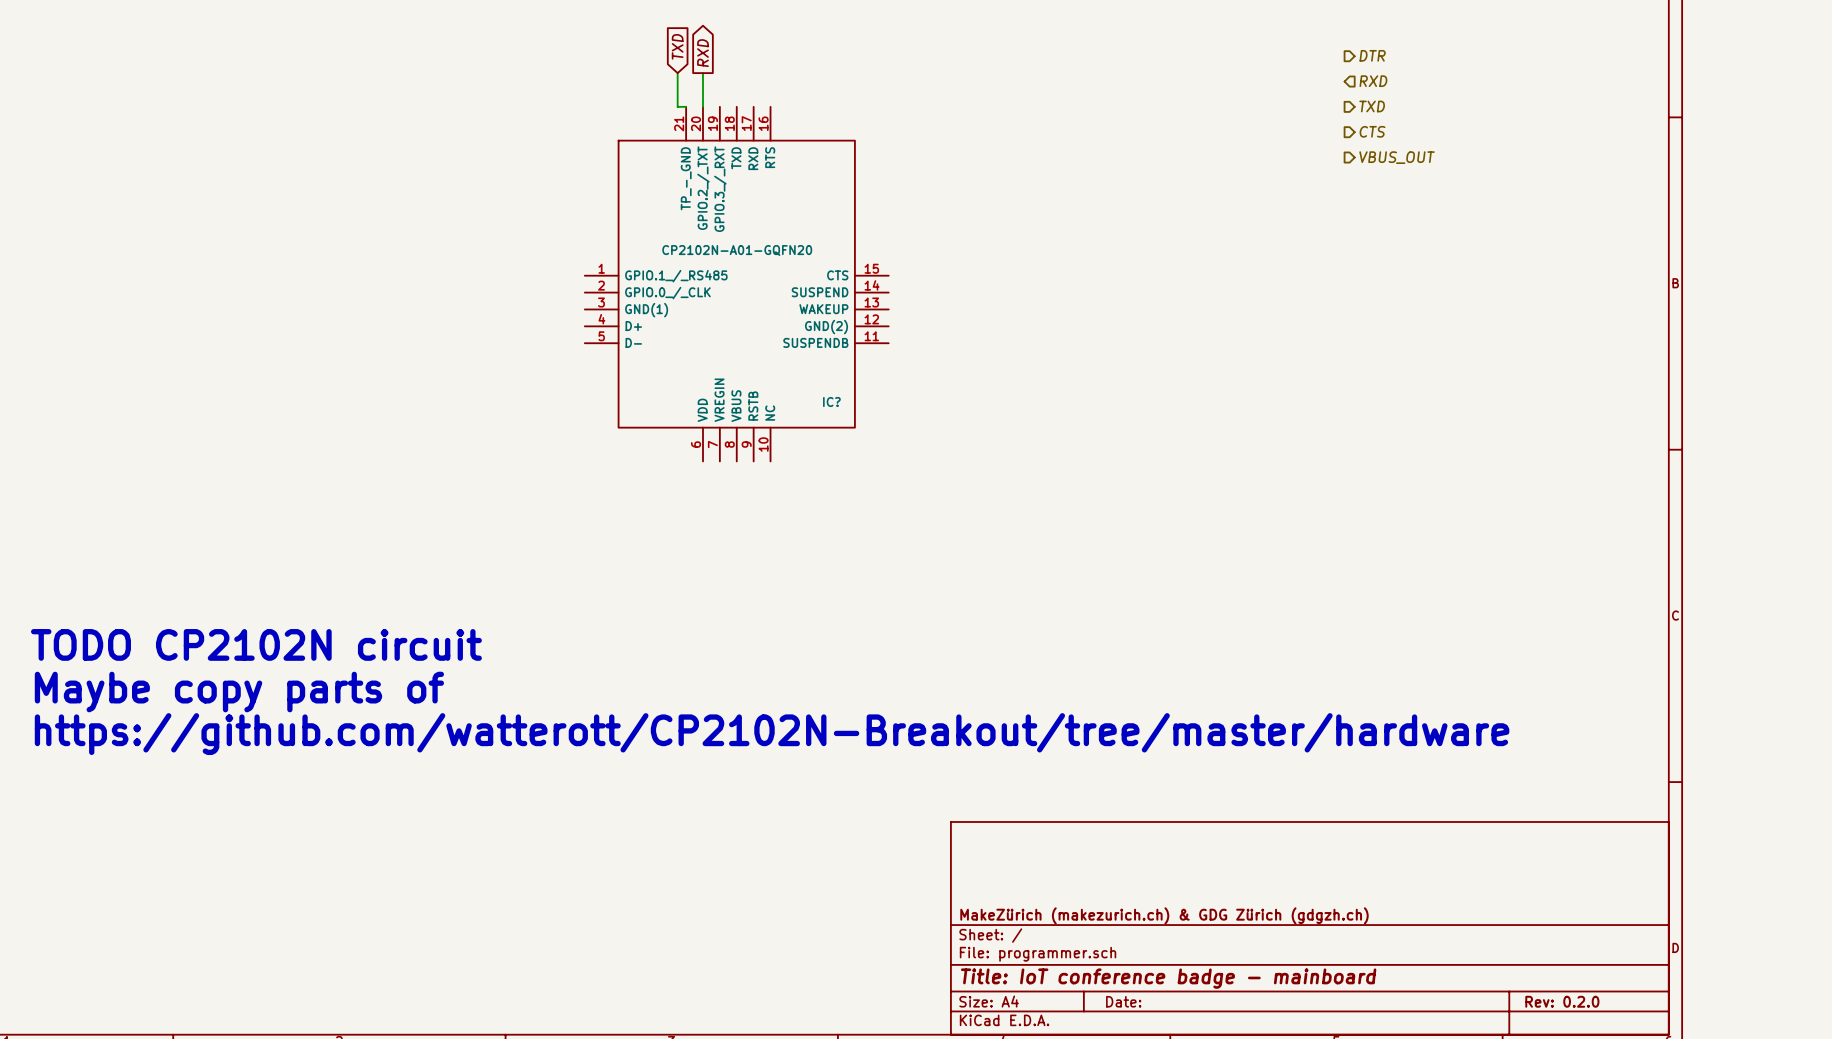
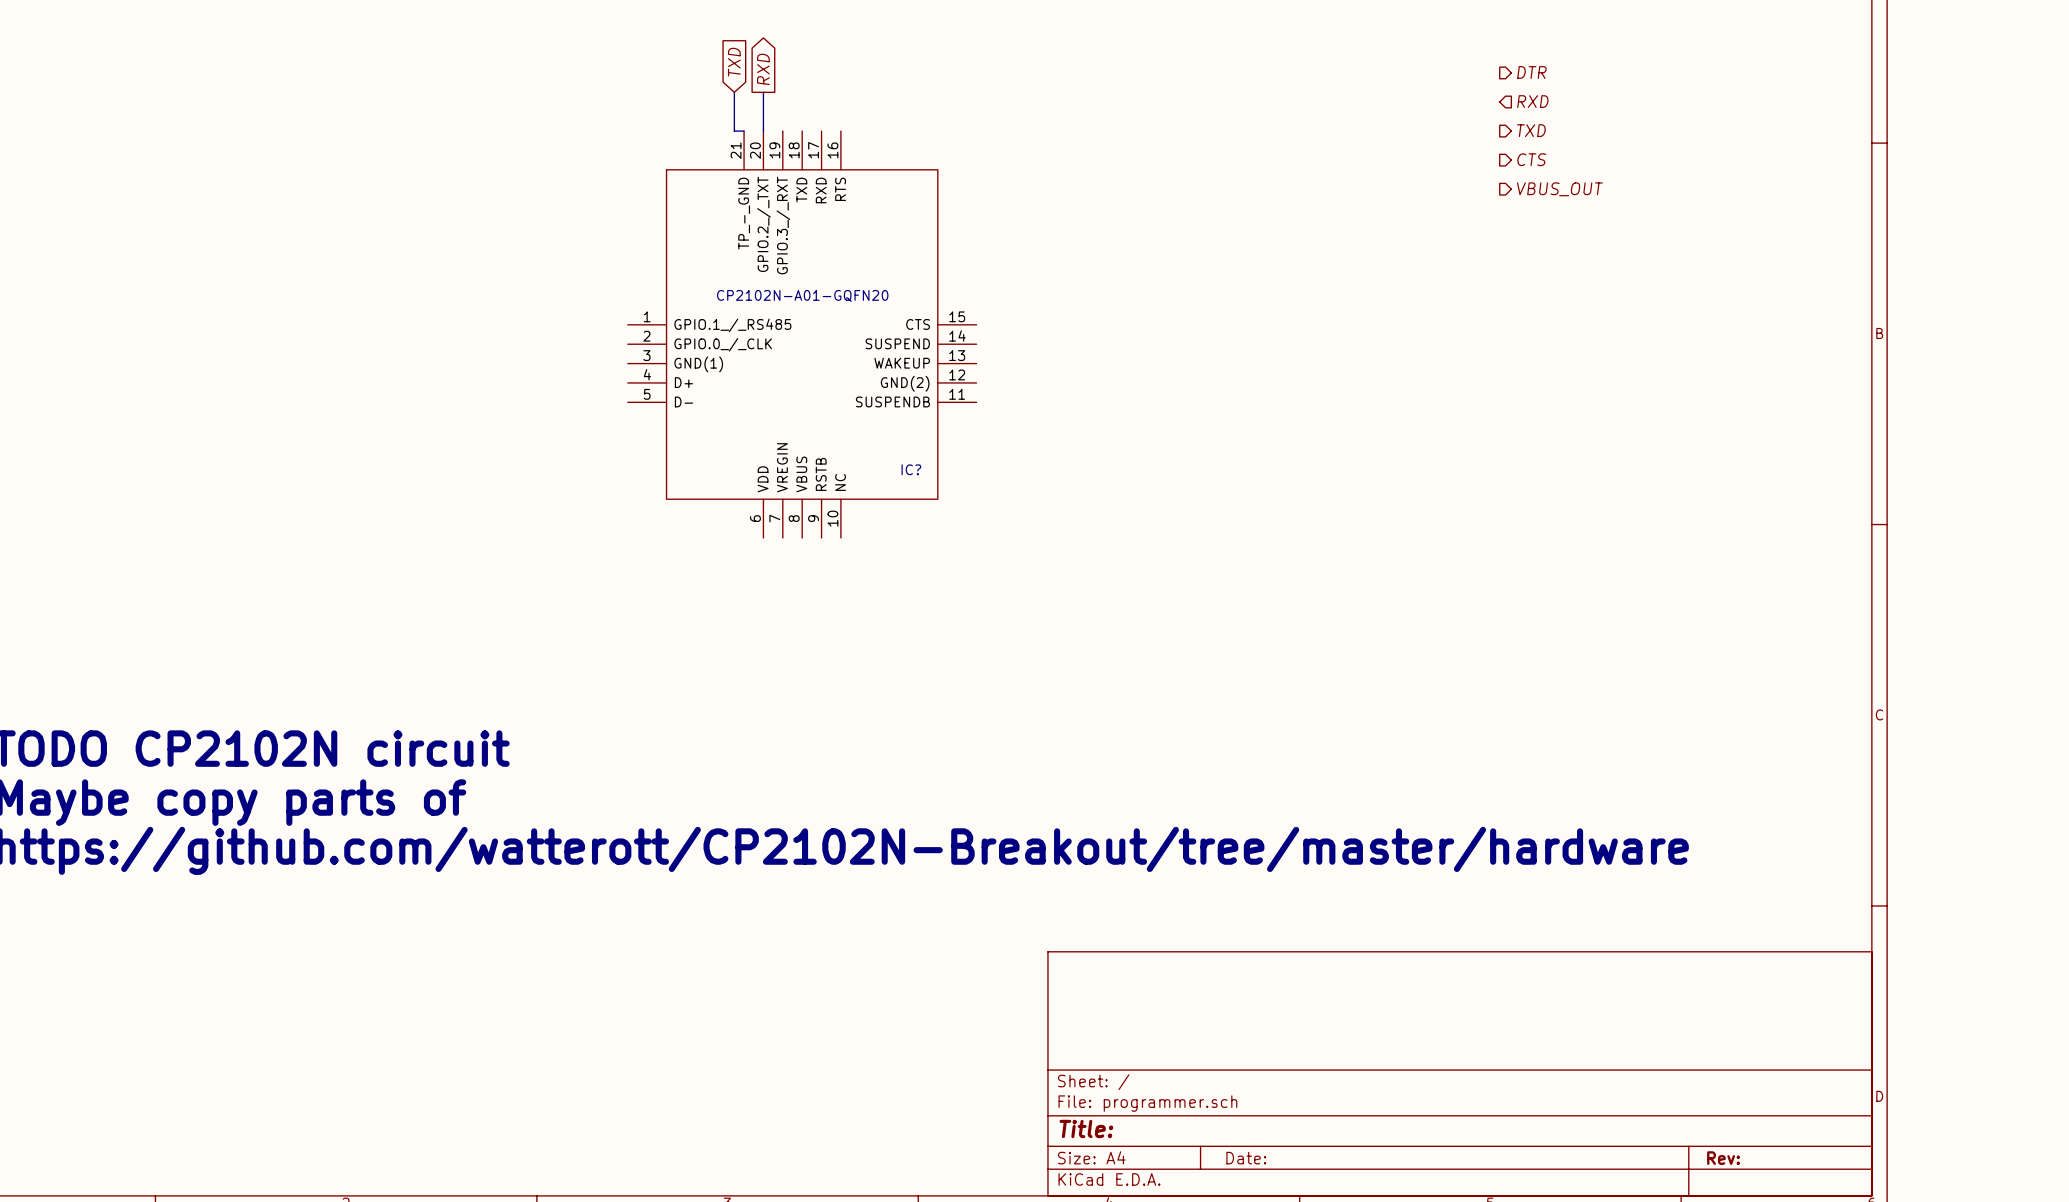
title block: MakeZürich (makezurich.ch) & GDG Zürich (gdgzh.ch) (1164, 915) -> none
title block: Title: IoT conference badge - mainboard (1168, 978) -> Title: (1086, 1128)
title block: Rev: 0.2.0 (1562, 1001) -> Rev: (1723, 1158)

